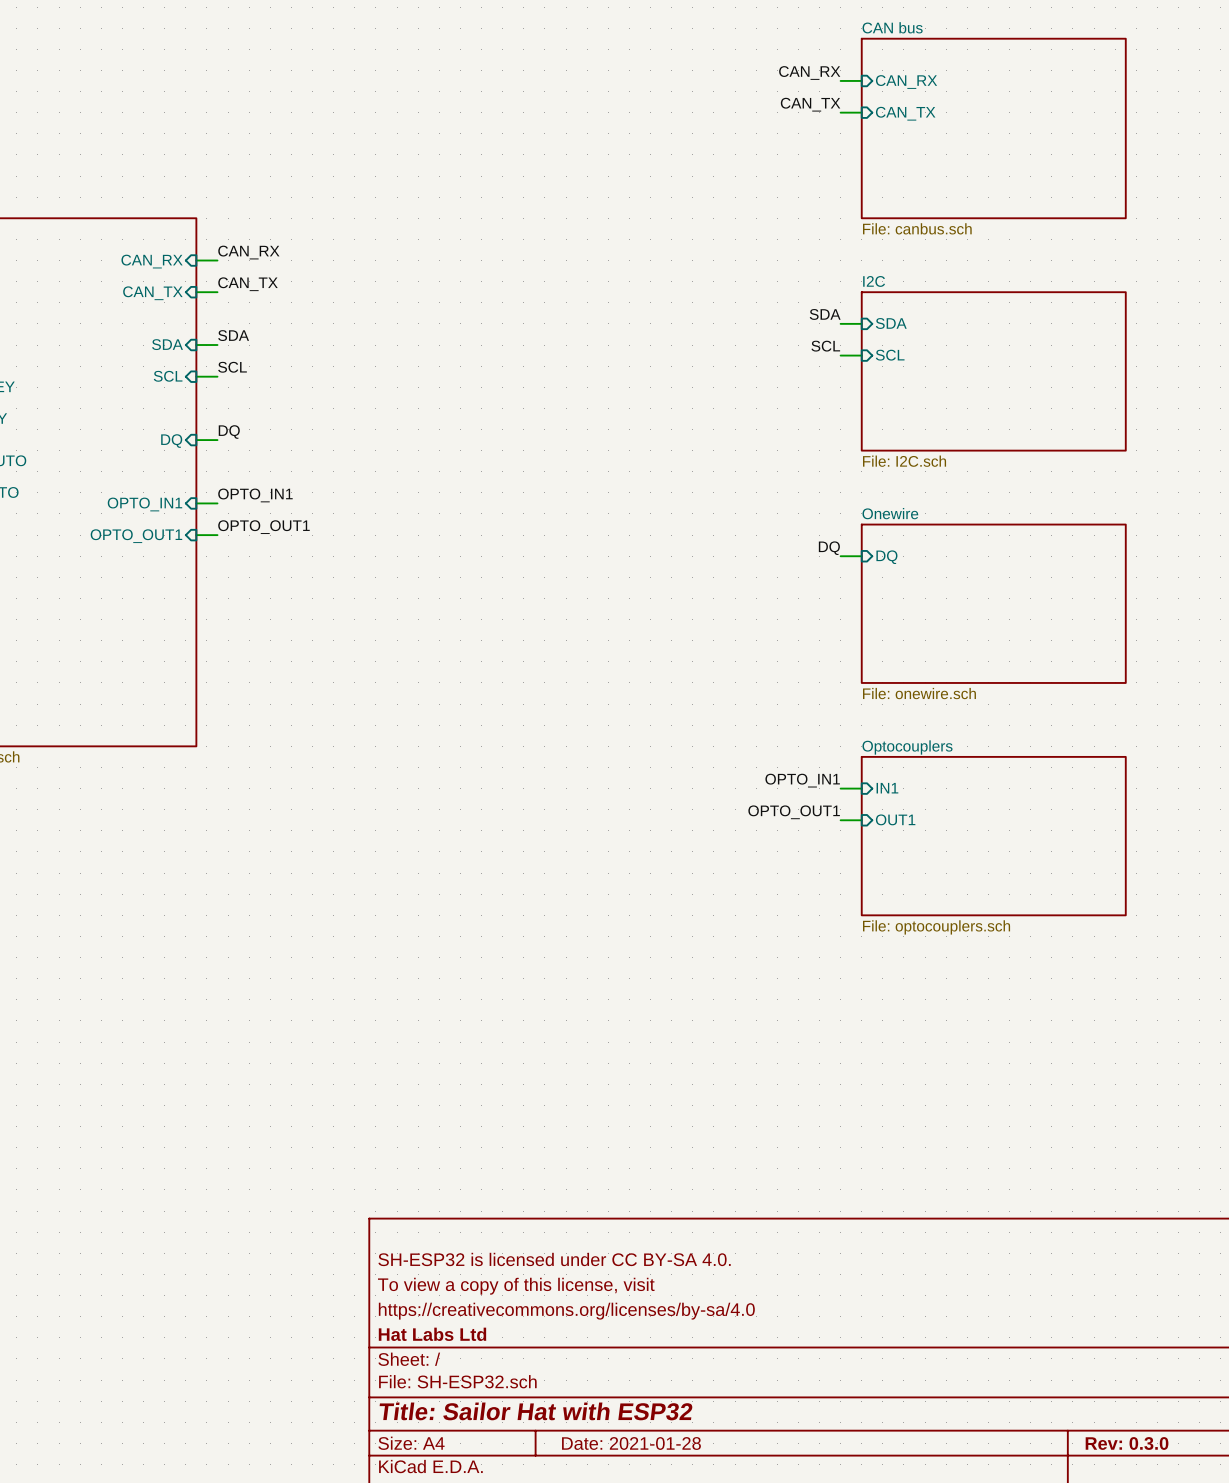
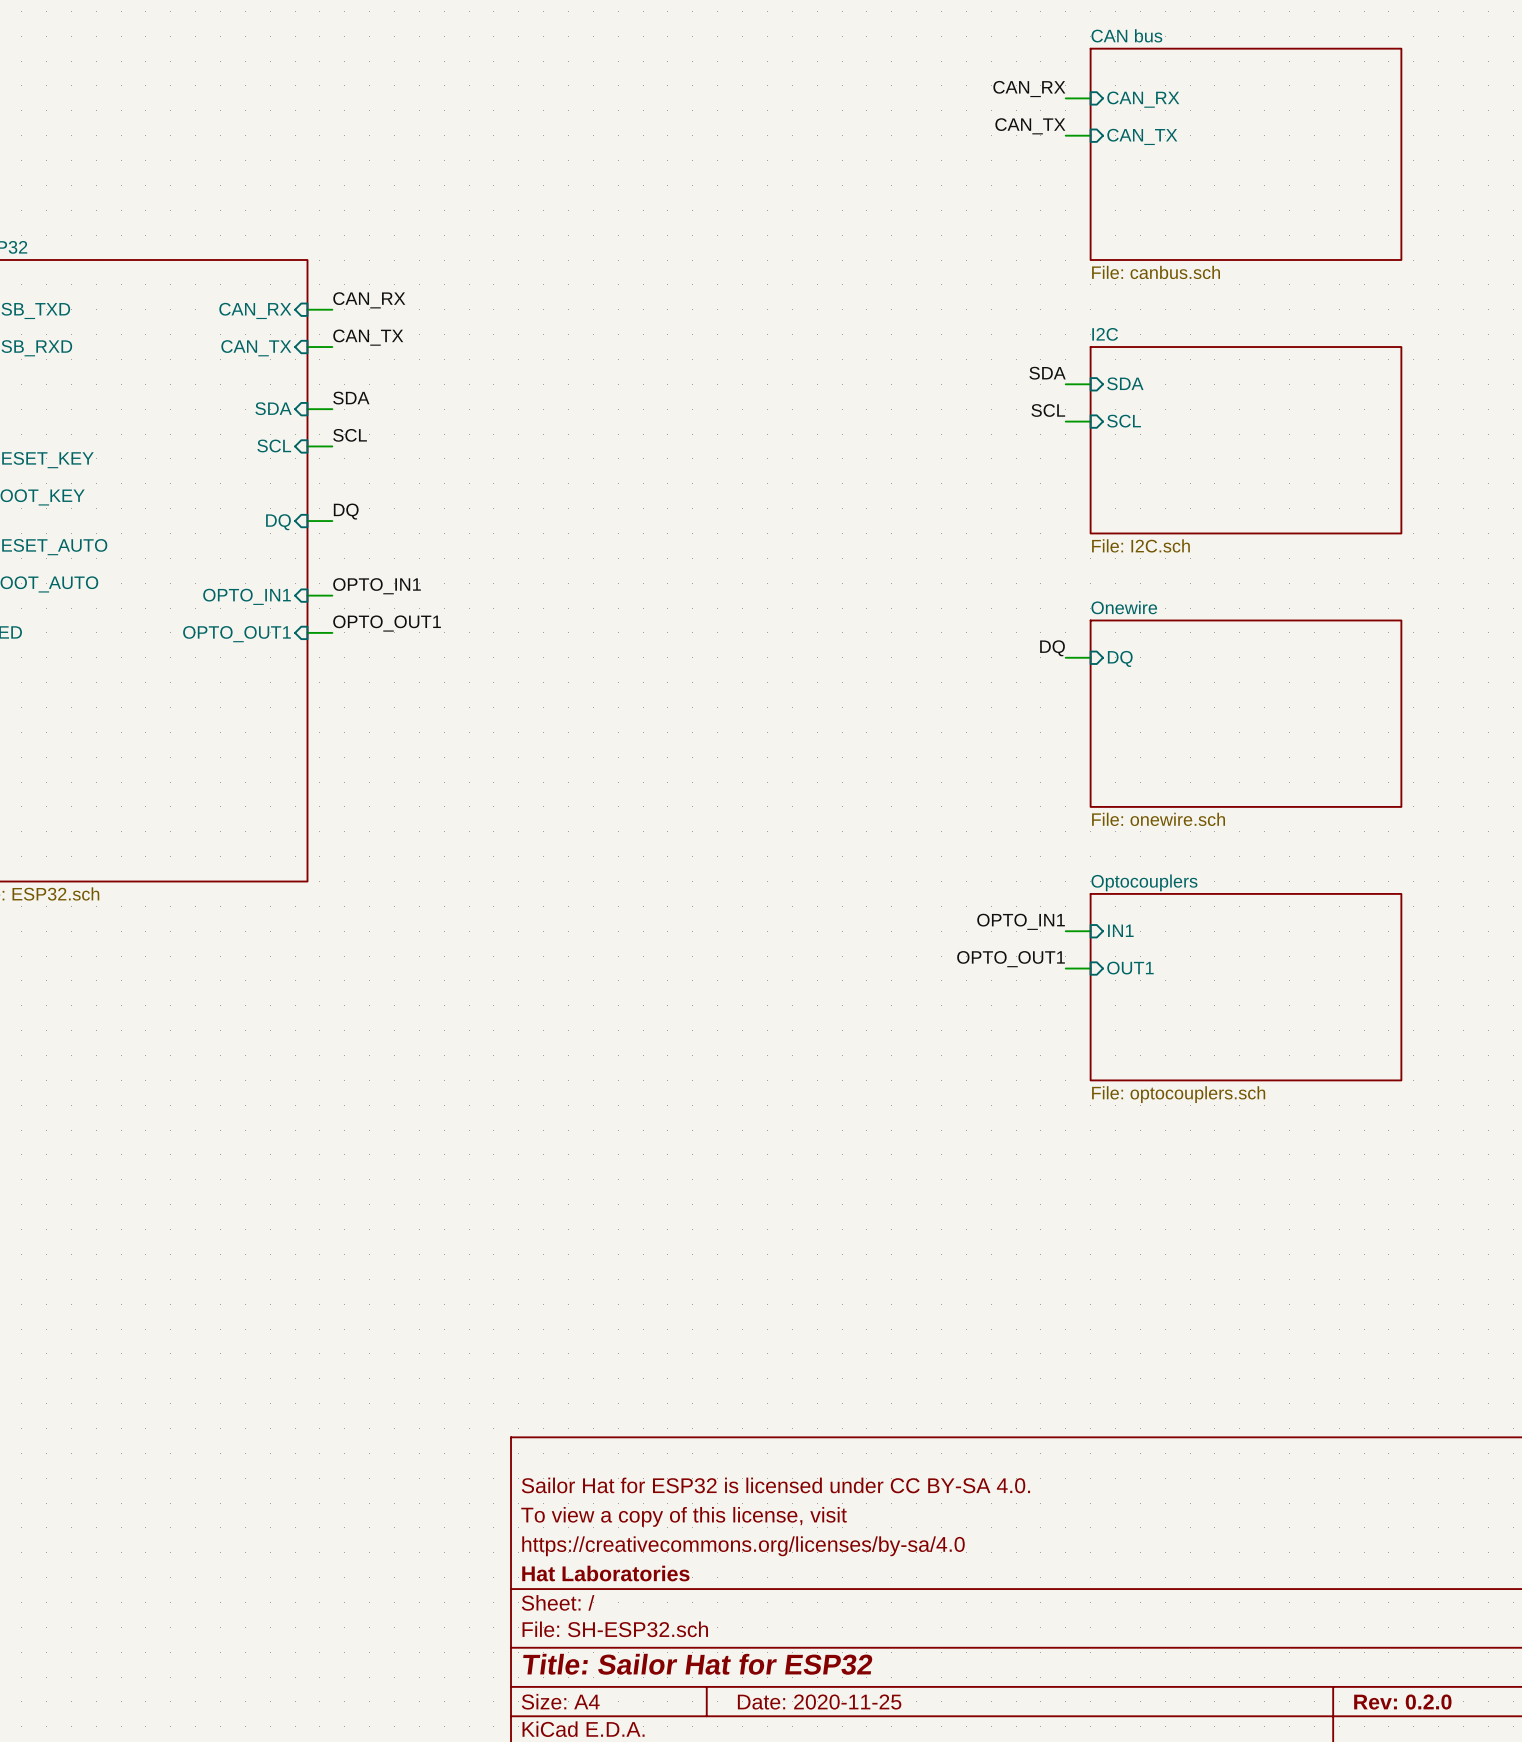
title block: SH-ESP32 is licensed under CC BY-SA 4.0. (554, 1259) -> Sailor Hat for ESP32 is licensed under CC BY-SA 4.0. (775, 1485)
title block: Hat Labs Ltd (432, 1334) -> Hat Laboratories (605, 1573)
title block: Title: Sailor Hat with ESP32 (536, 1411) -> Title: Sailor Hat for ESP32 (697, 1664)
title block: Date: 2021-01-28 (631, 1443) -> Date: 2020-11-25 (819, 1702)
title block: Rev: 0.3.0 (1127, 1443) -> Rev: 0.2.0 (1402, 1702)

